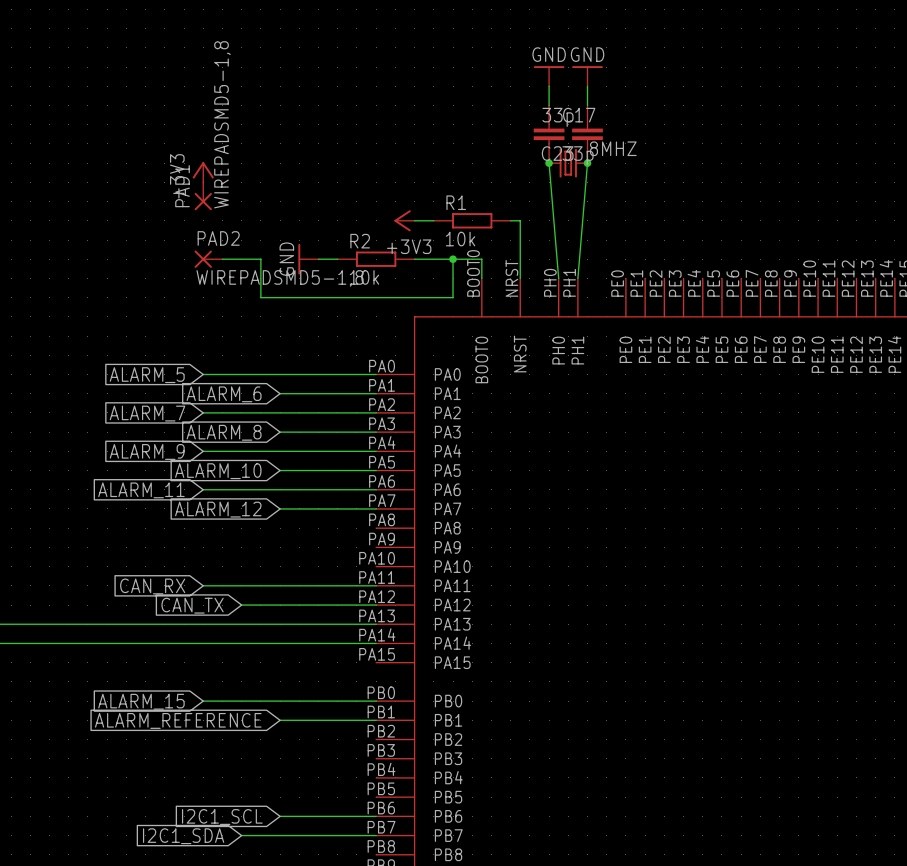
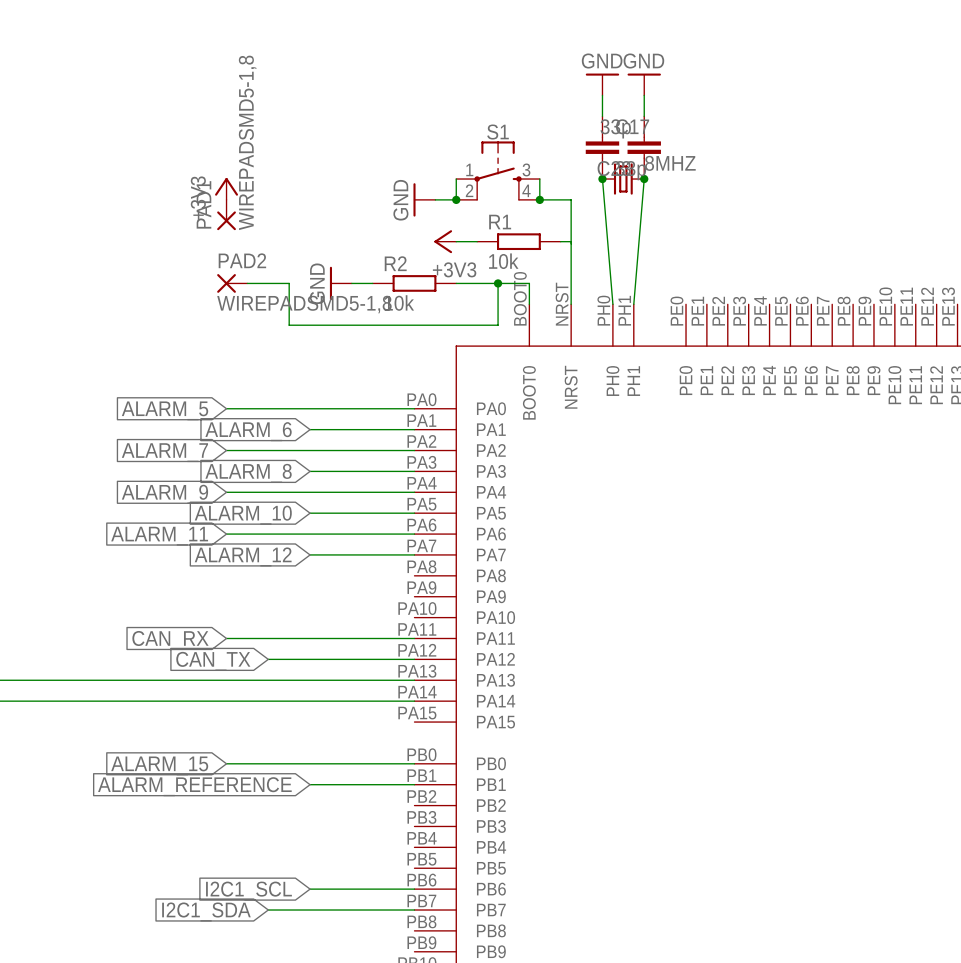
S1: none -> (498, 170)
wire: none -> (456, 179) (456, 199) (435, 199)
wire: none -> (539, 179) (539, 199) (571, 199) (571, 241)
power symbol: none -> GND (424, 199)
junction: none -> (456, 199)
junction: none -> (539, 199)

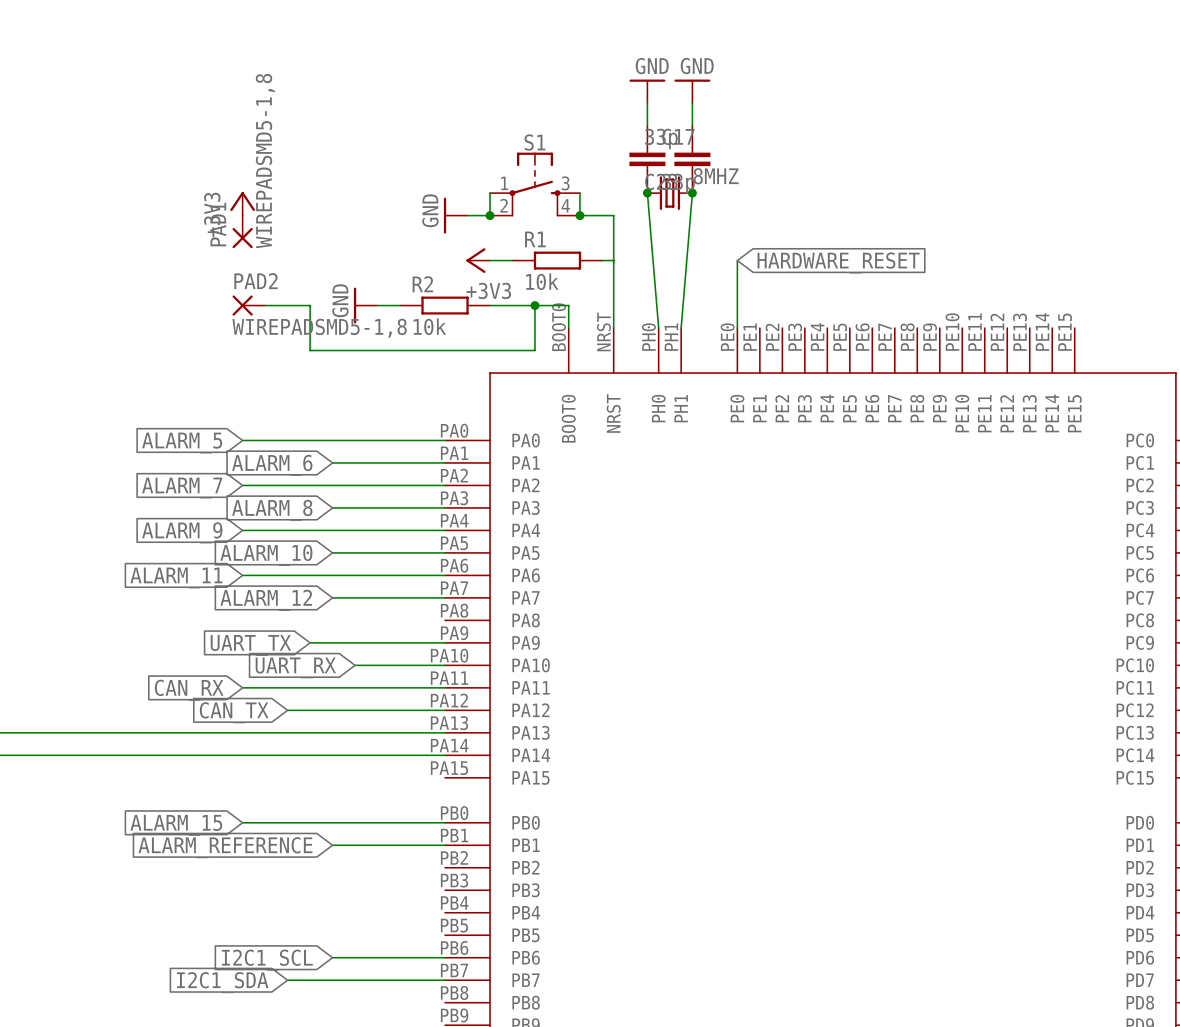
wire: none -> (737, 260) (737, 328)
global label: none -> HARDWARE_RESET (838, 262)
wire: none -> (310, 642) (445, 642)
global label: none -> UART_TX (250, 645)
wire: none -> (355, 665) (445, 665)
global label: none -> UART_RX (295, 667)

